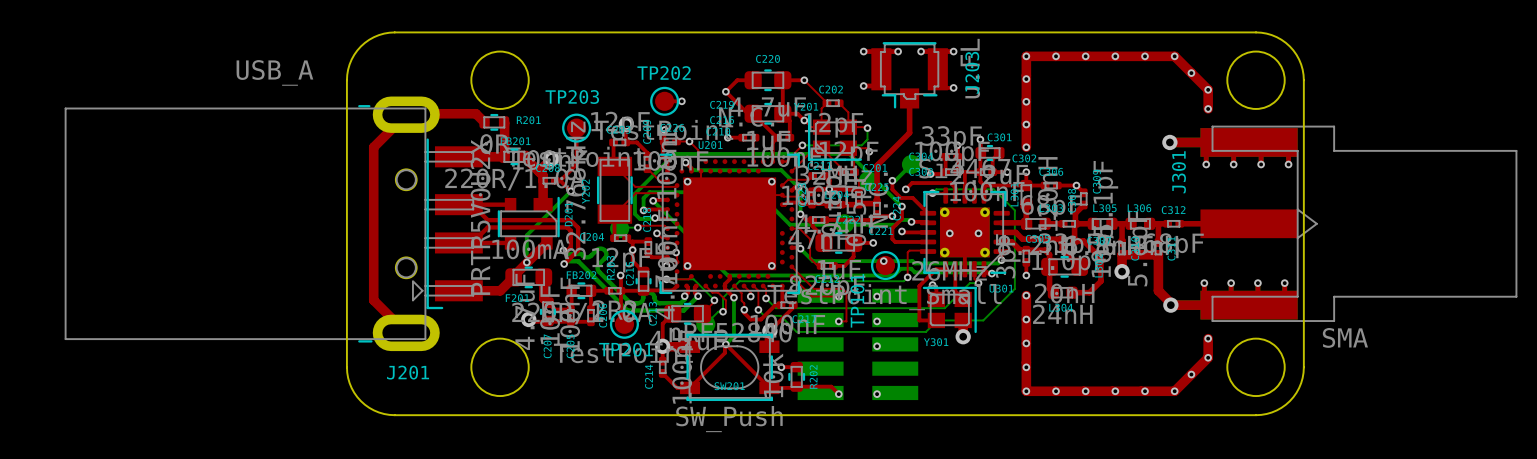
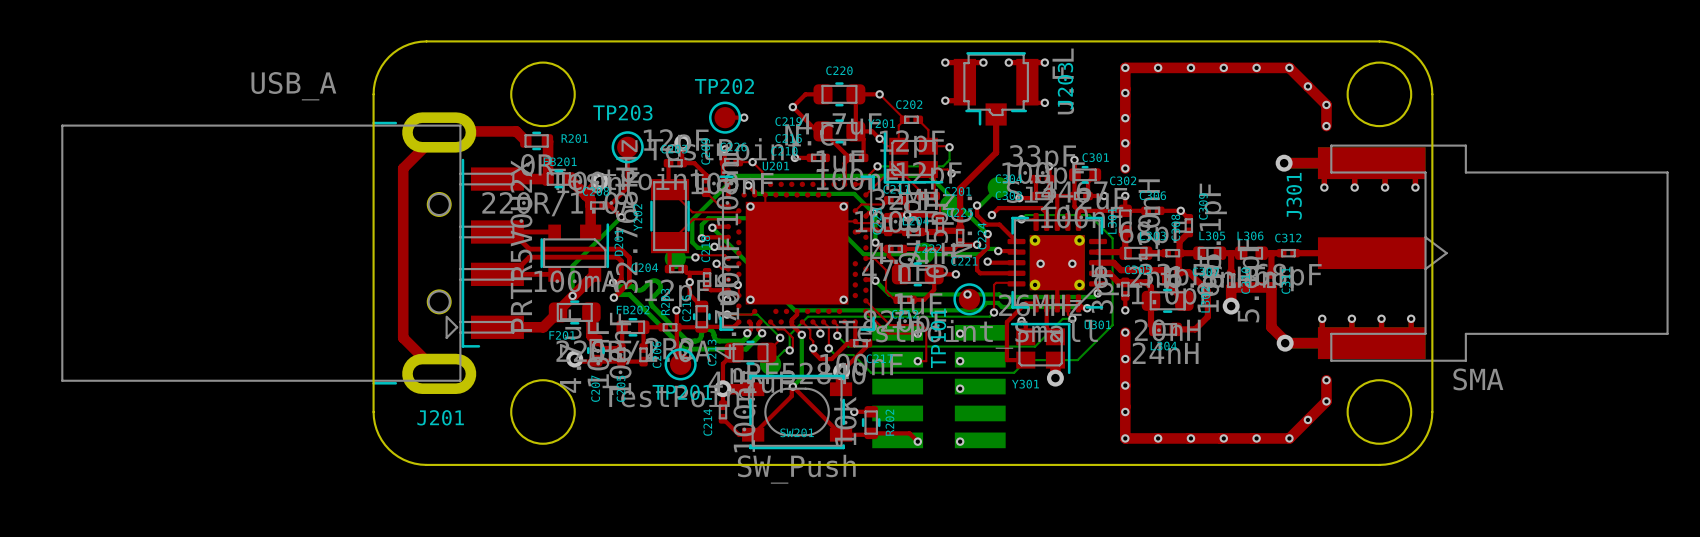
J201 footprint: [64, 96, 483, 352] -> [61, 112, 524, 394]

